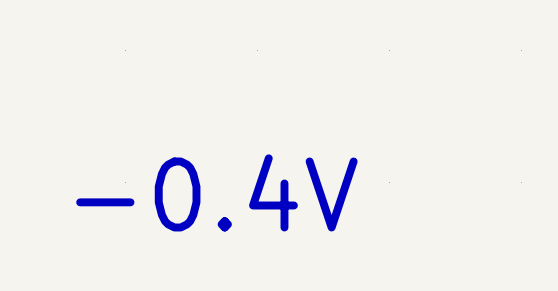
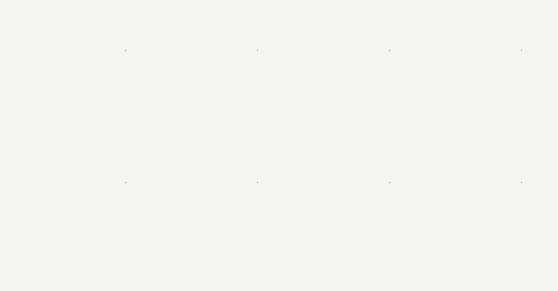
text: -0.4V (216, 192) -> none

